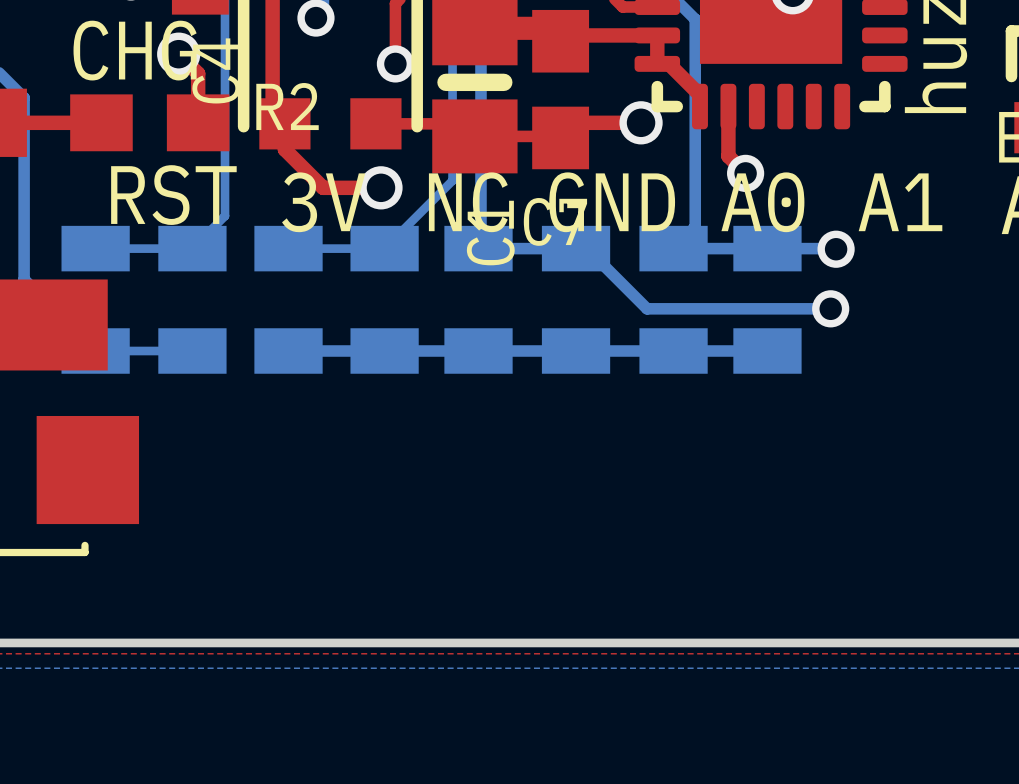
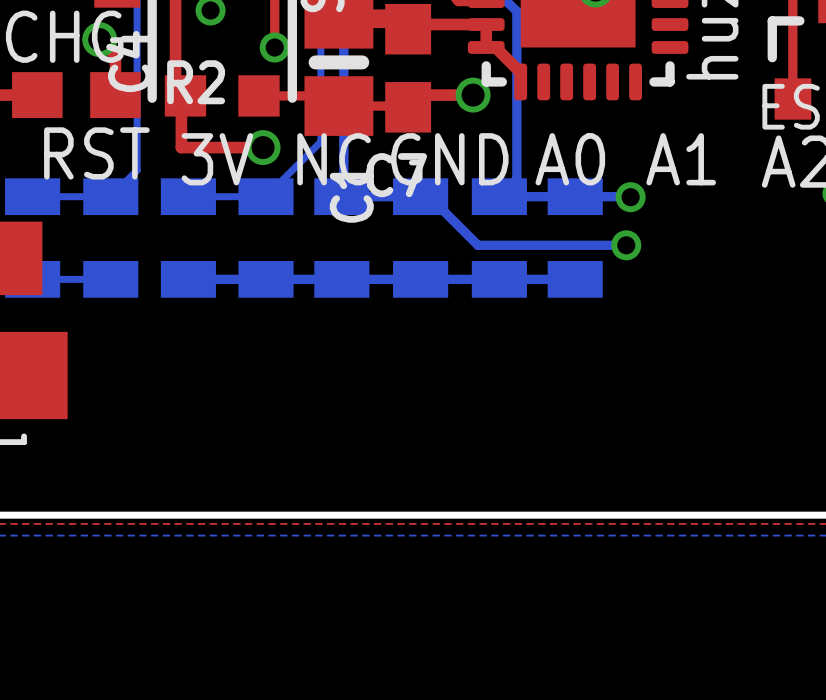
top track: (728, 106) (728, 156) (745, 173) -> none
top track: (284, 123) (284, 149) (323, 187) -> (185, 95) (181, 100) (181, 147) (216, 147)
via: (745, 173) -> none

